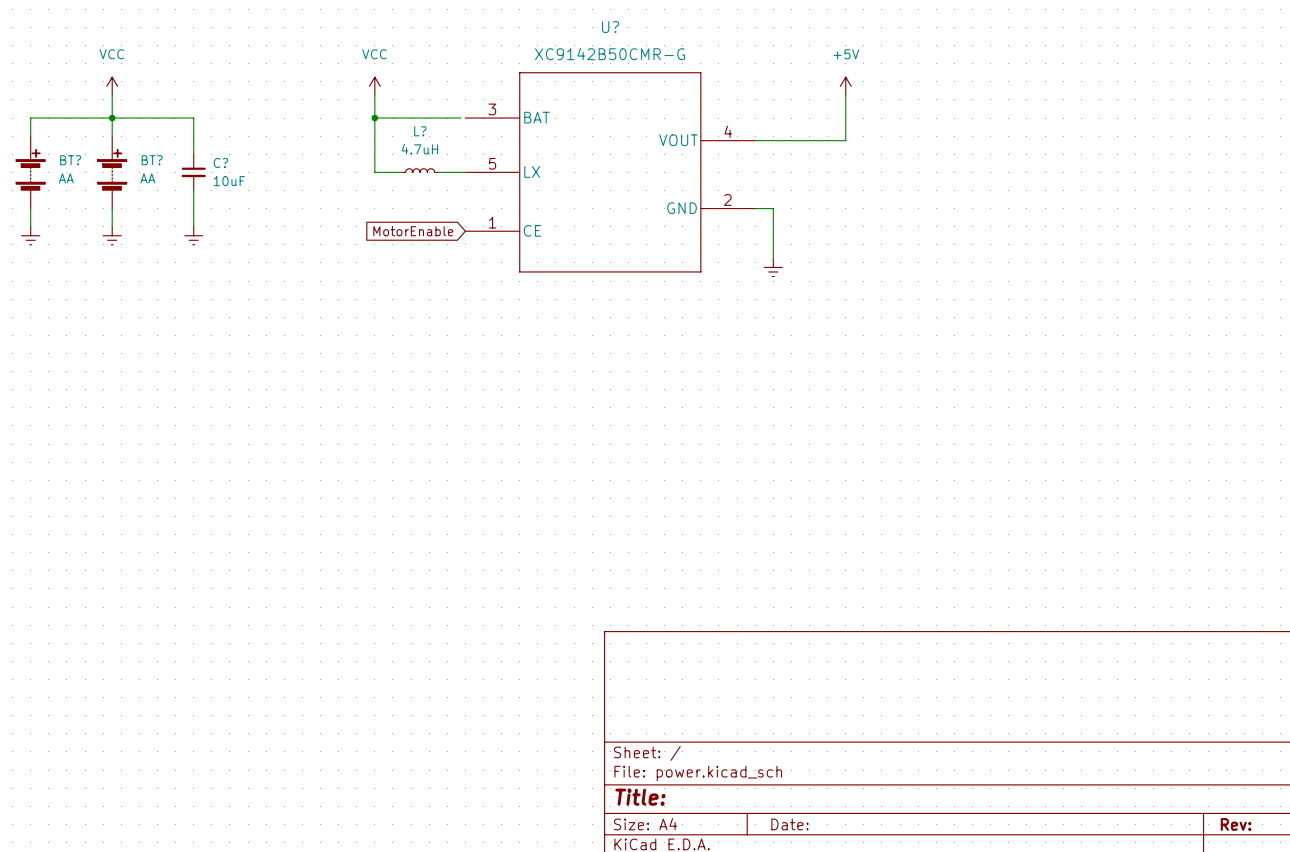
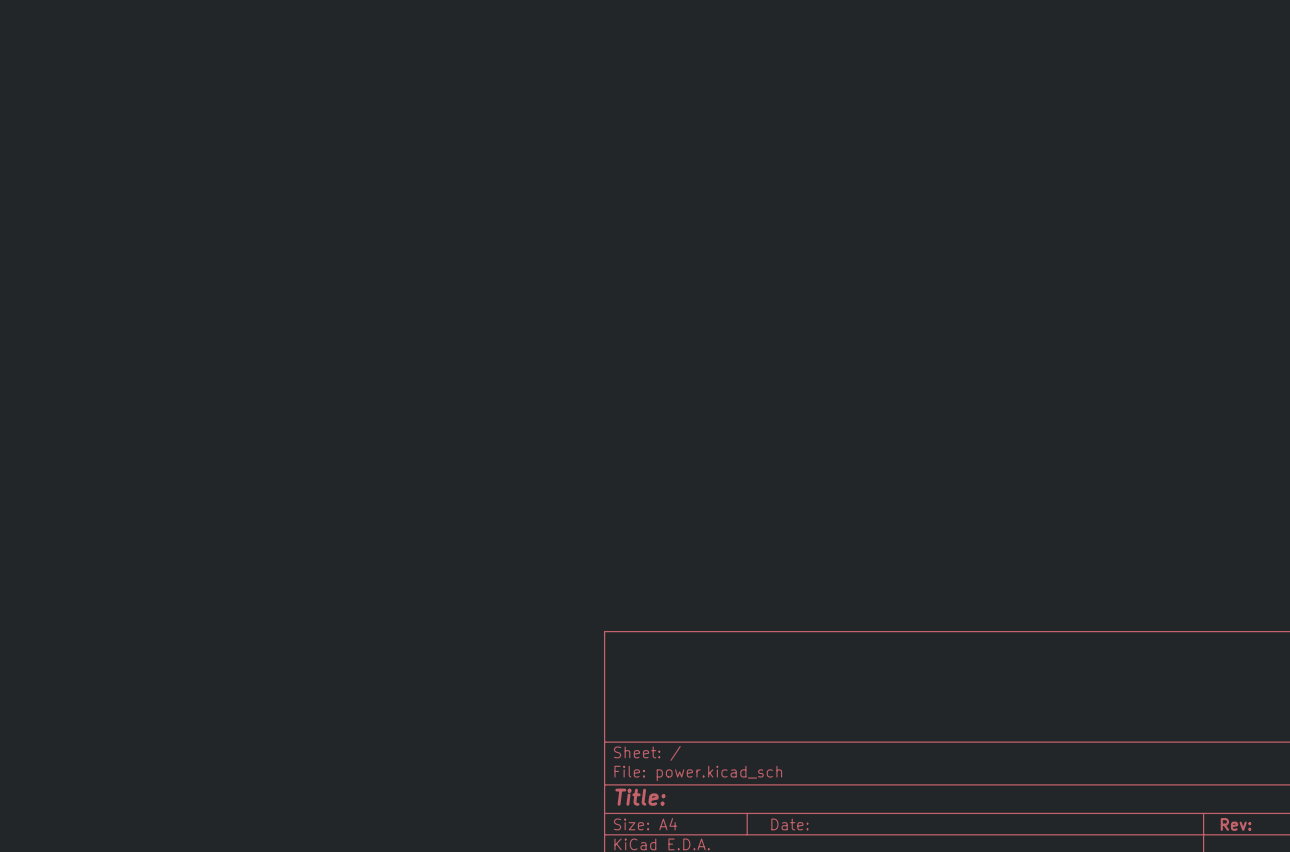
power symbol: VCC (112, 86) -> none
power symbol: VCC (374, 86) -> none
power symbol: +5V (845, 86) -> none
wire: (112, 95) (112, 136) -> none
wire: (374, 95) (374, 172) (402, 172) -> none
wire: (845, 95) (845, 140) (755, 140) -> none
junction: (112, 118) -> none
wire: (374, 118) (460, 118) -> none
junction: (374, 118) -> none
wire: (30, 136) (30, 118) (193, 118) (193, 154) -> none
L?: 4.7uH (420, 170) -> none
BT?: AA (30, 172) -> none
BT?: AA (112, 172) -> none
C?: 10uF (193, 172) -> none
wire: (438, 172) (465, 172) -> none
U?: XC9142B50CMR-G (610, 172) -> none
wire: (193, 190) (193, 226) -> none
wire: (30, 208) (30, 226) -> none
wire: (112, 208) (112, 226) -> none
wire: (755, 208) (773, 208) (773, 258) -> none
global label: MotorEnable (413, 231) -> none
power symbol: (30, 235) -> none
power symbol: (112, 235) -> none
power symbol: (193, 235) -> none
power symbol: (773, 267) -> none

